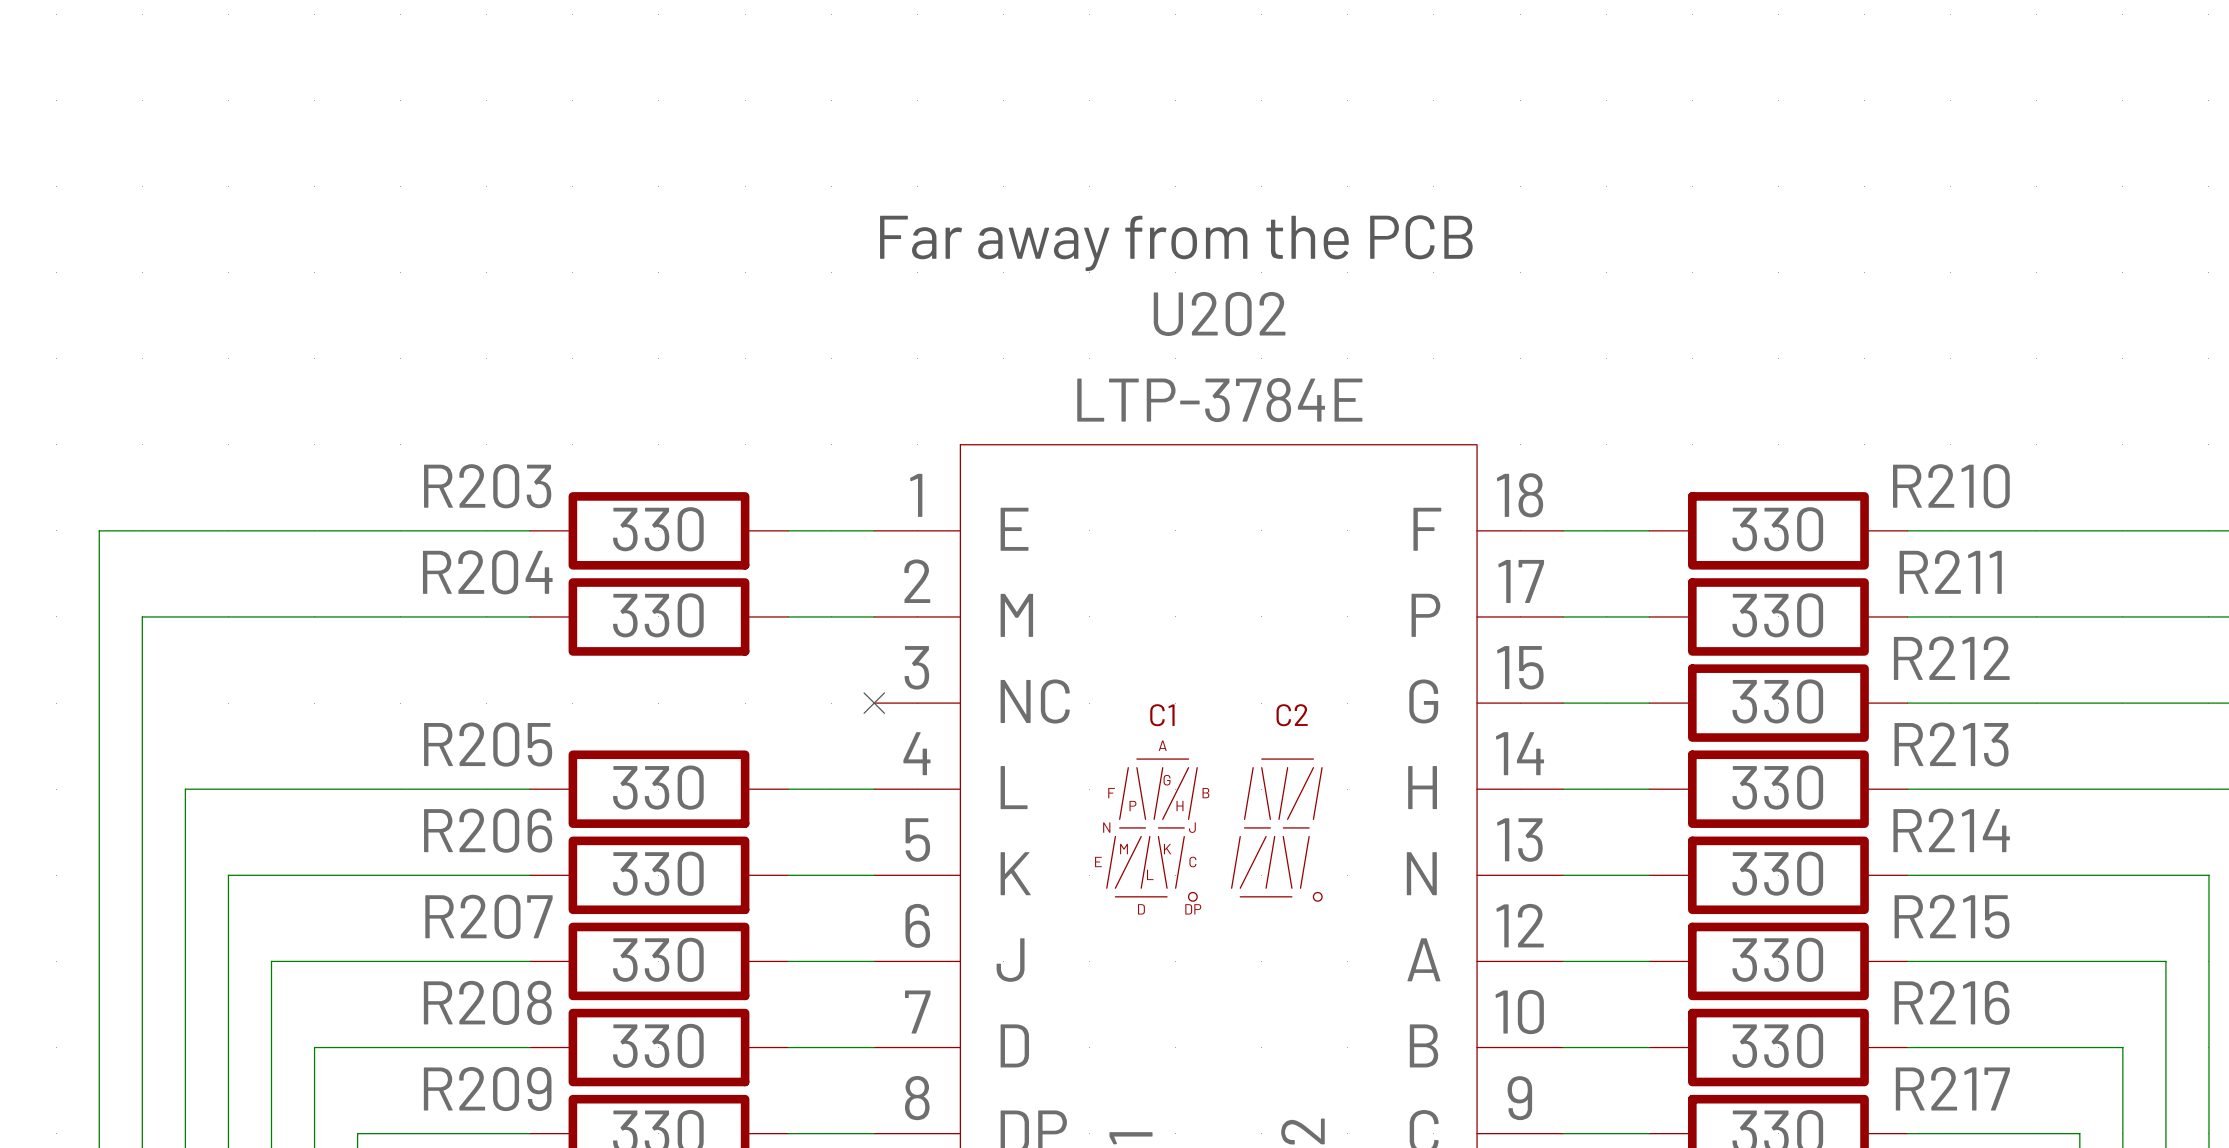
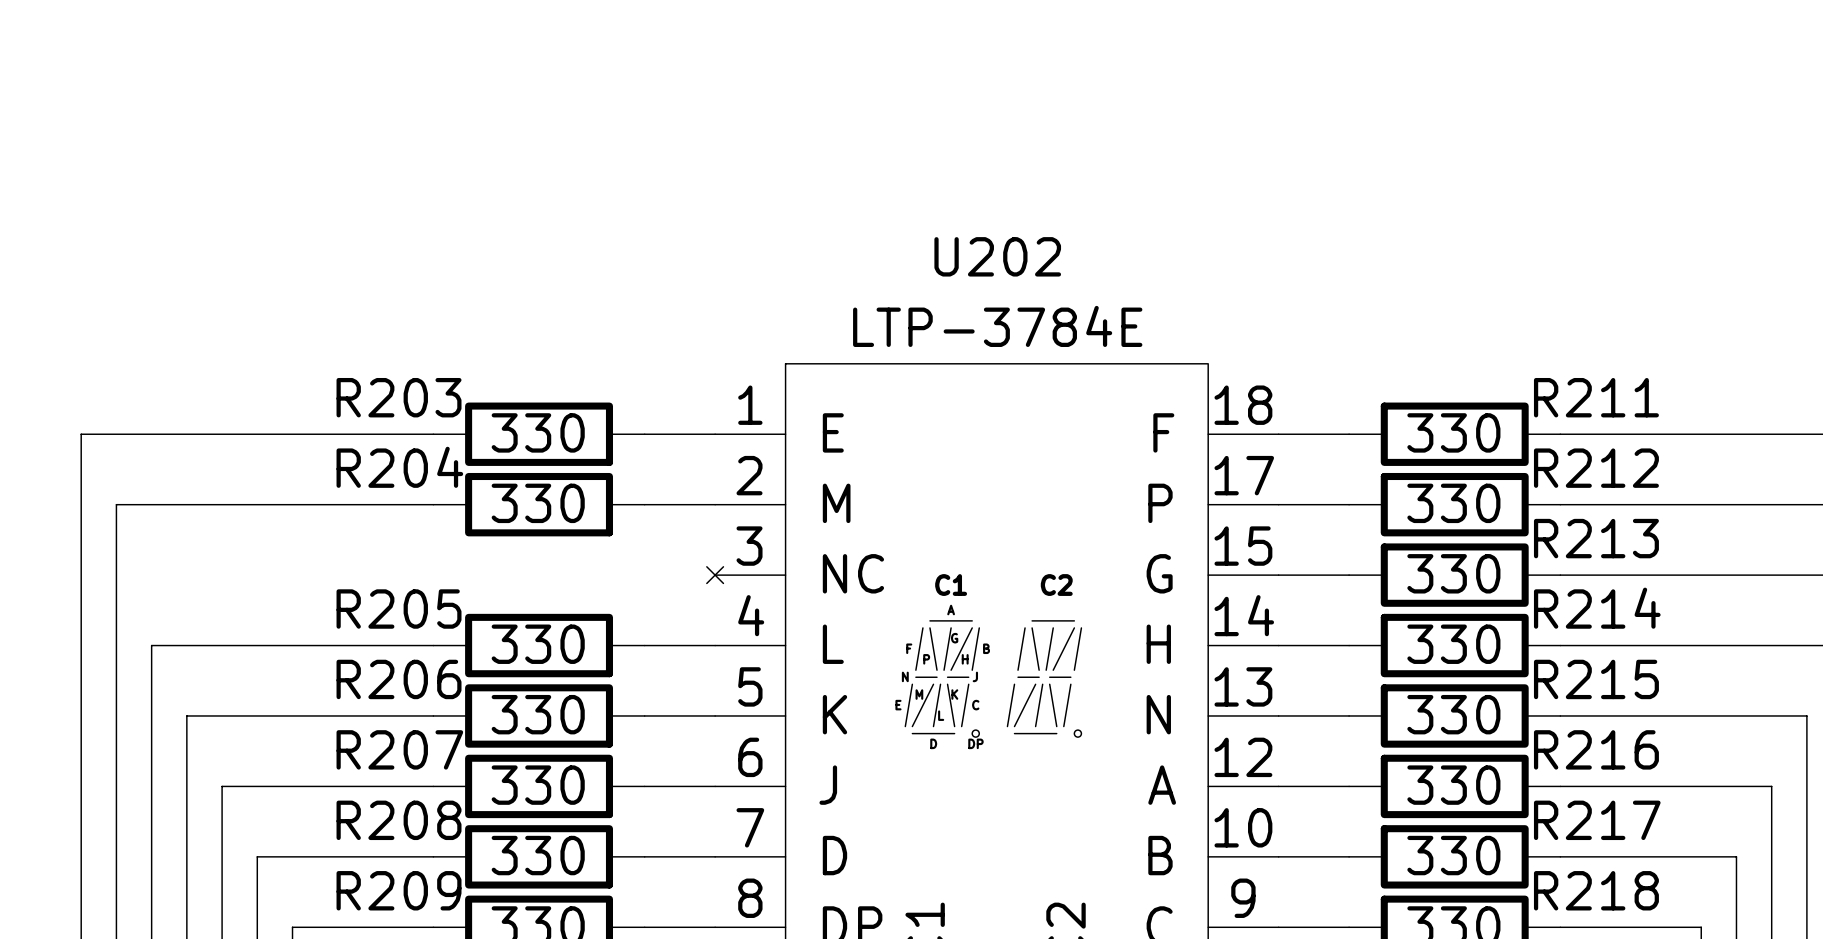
text: Far away from the PCB (1176, 243) -> none
R210 name: R210 (1951, 486) -> R211 (1596, 397)
R211 name: R211 (1950, 572) -> R212 (1596, 468)
R212 name: R212 (1951, 658) -> R213 (1596, 538)
R213 name: R213 (1951, 744) -> R214 (1597, 608)
R214 name: R214 (1951, 830) -> R215 (1596, 679)
R215 name: R215 (1952, 916) -> R216 (1596, 749)
R216 name: R216 (1952, 1002) -> R217 (1597, 820)
R217 name: R217 (1952, 1088) -> R218 (1596, 890)

